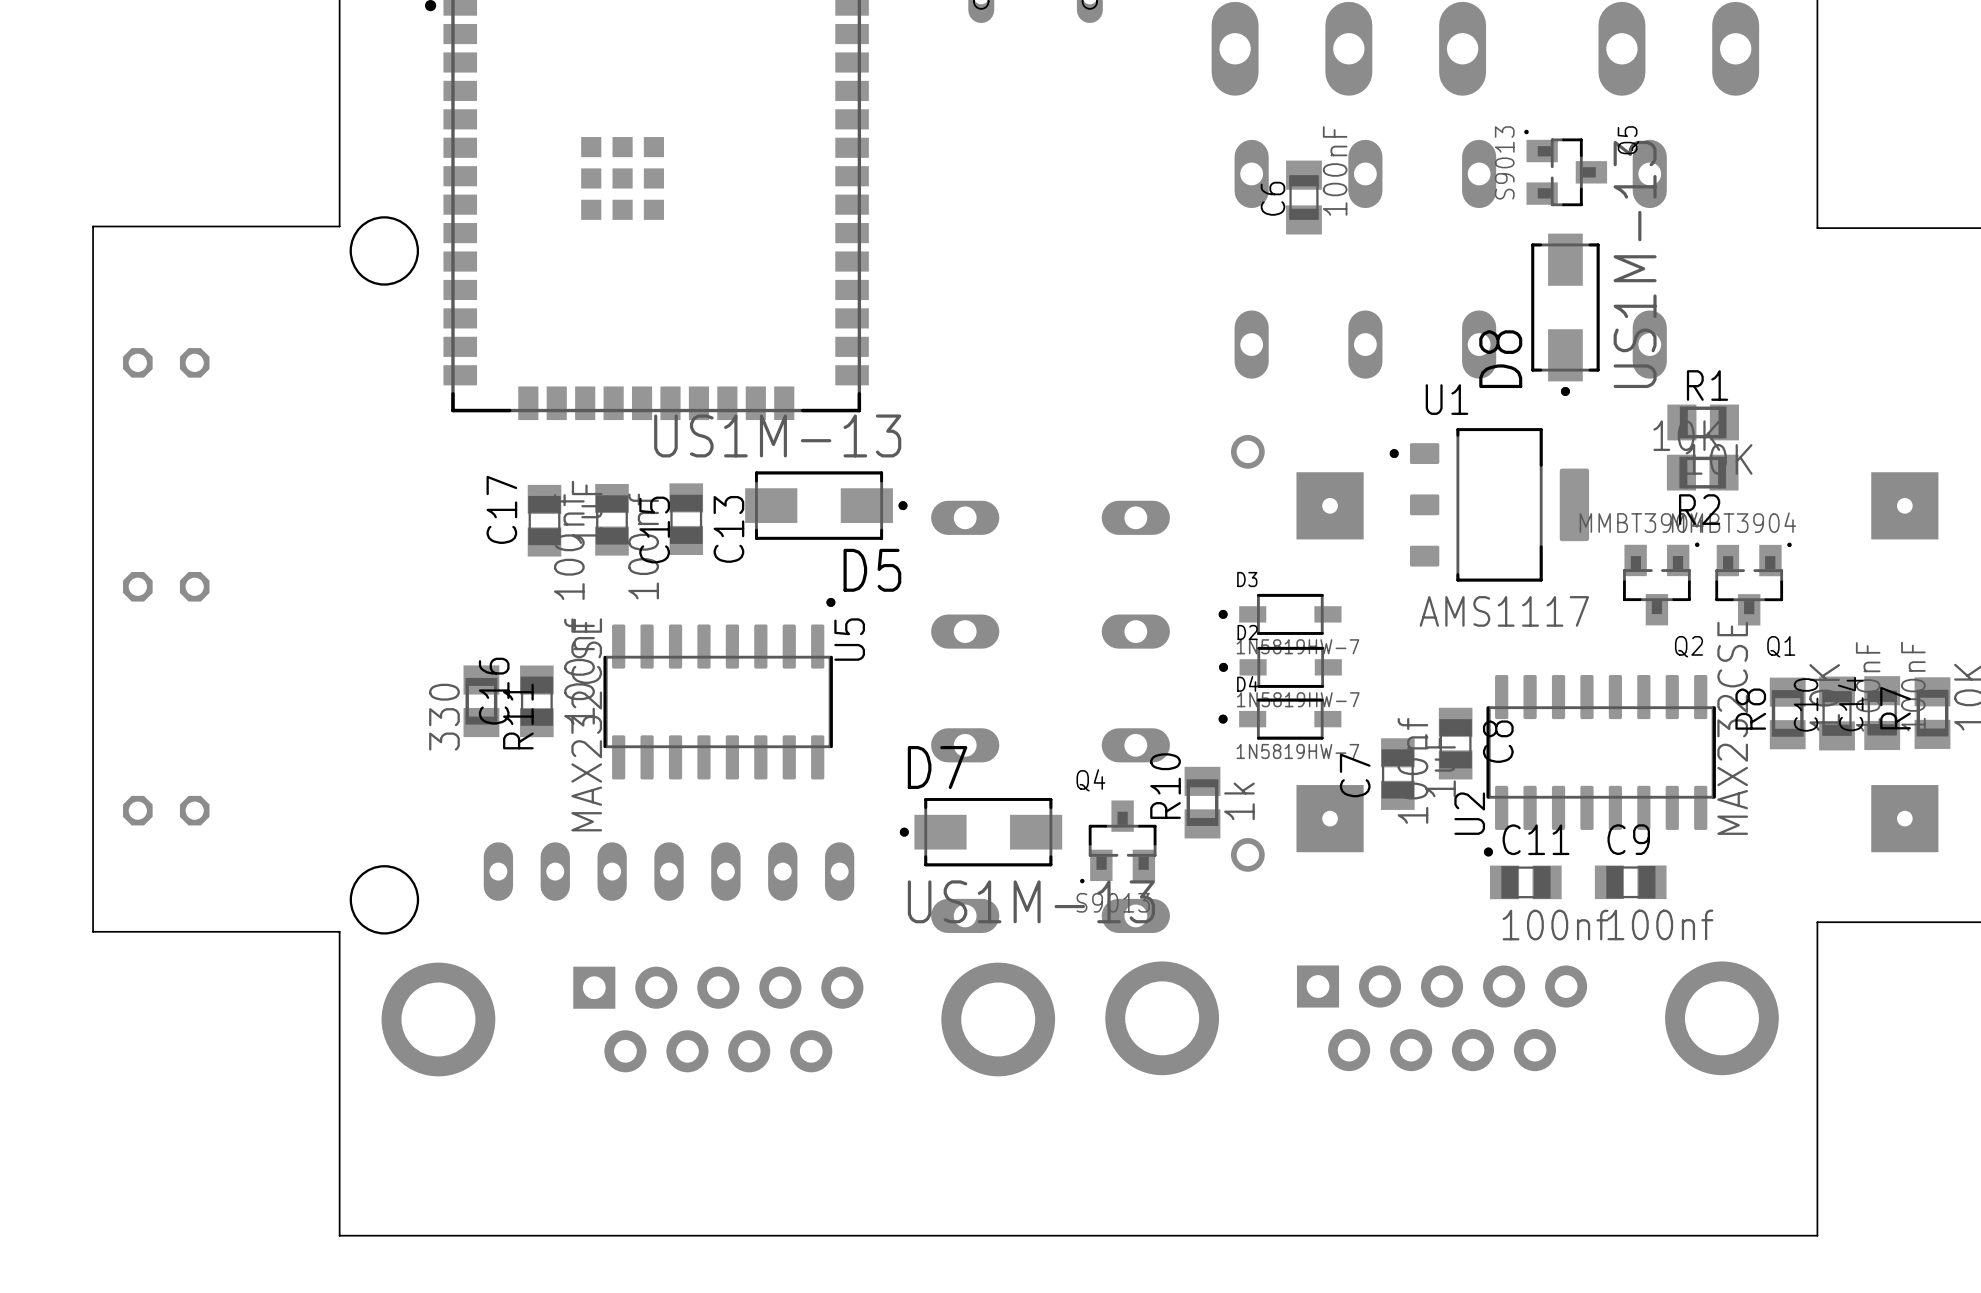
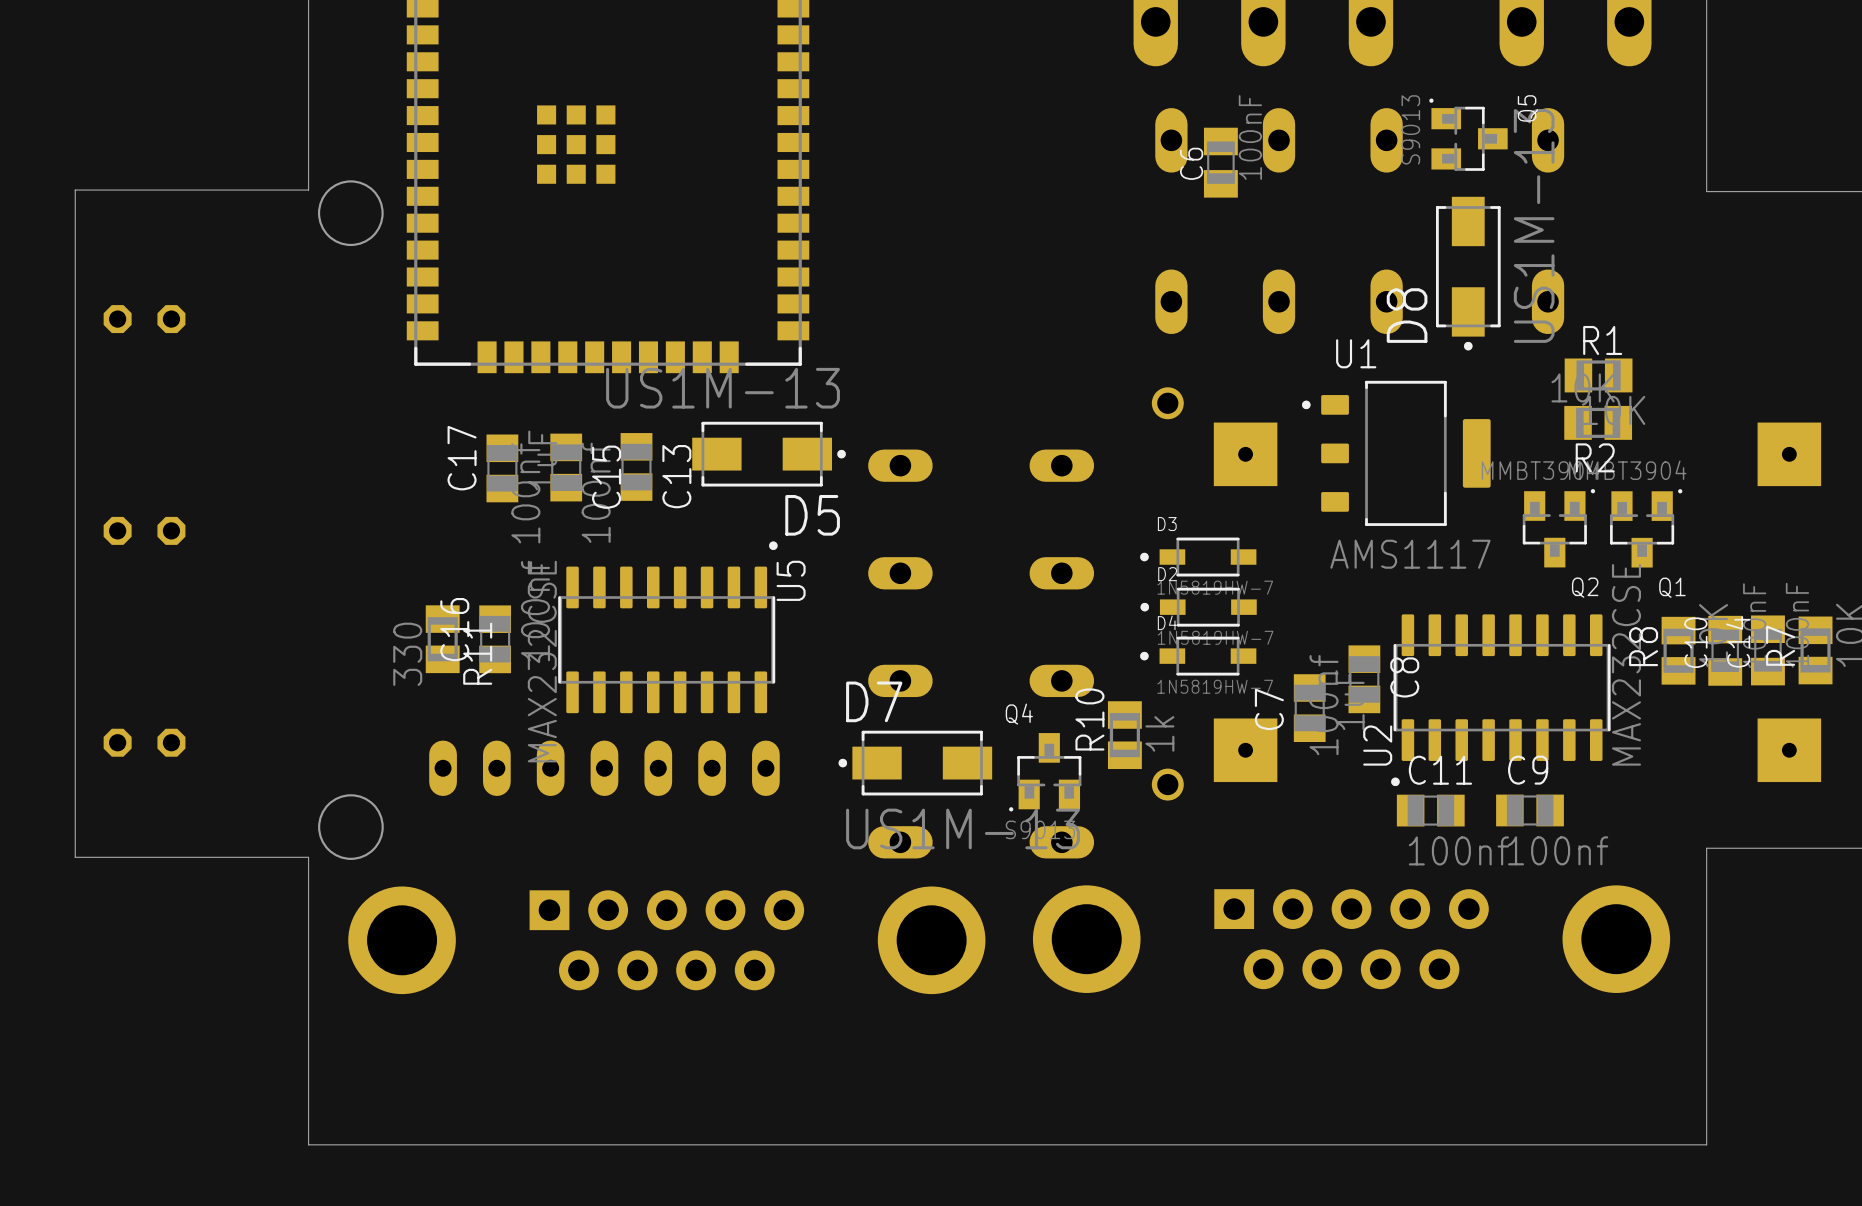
part position: (669, 871) -> (604, 768)

